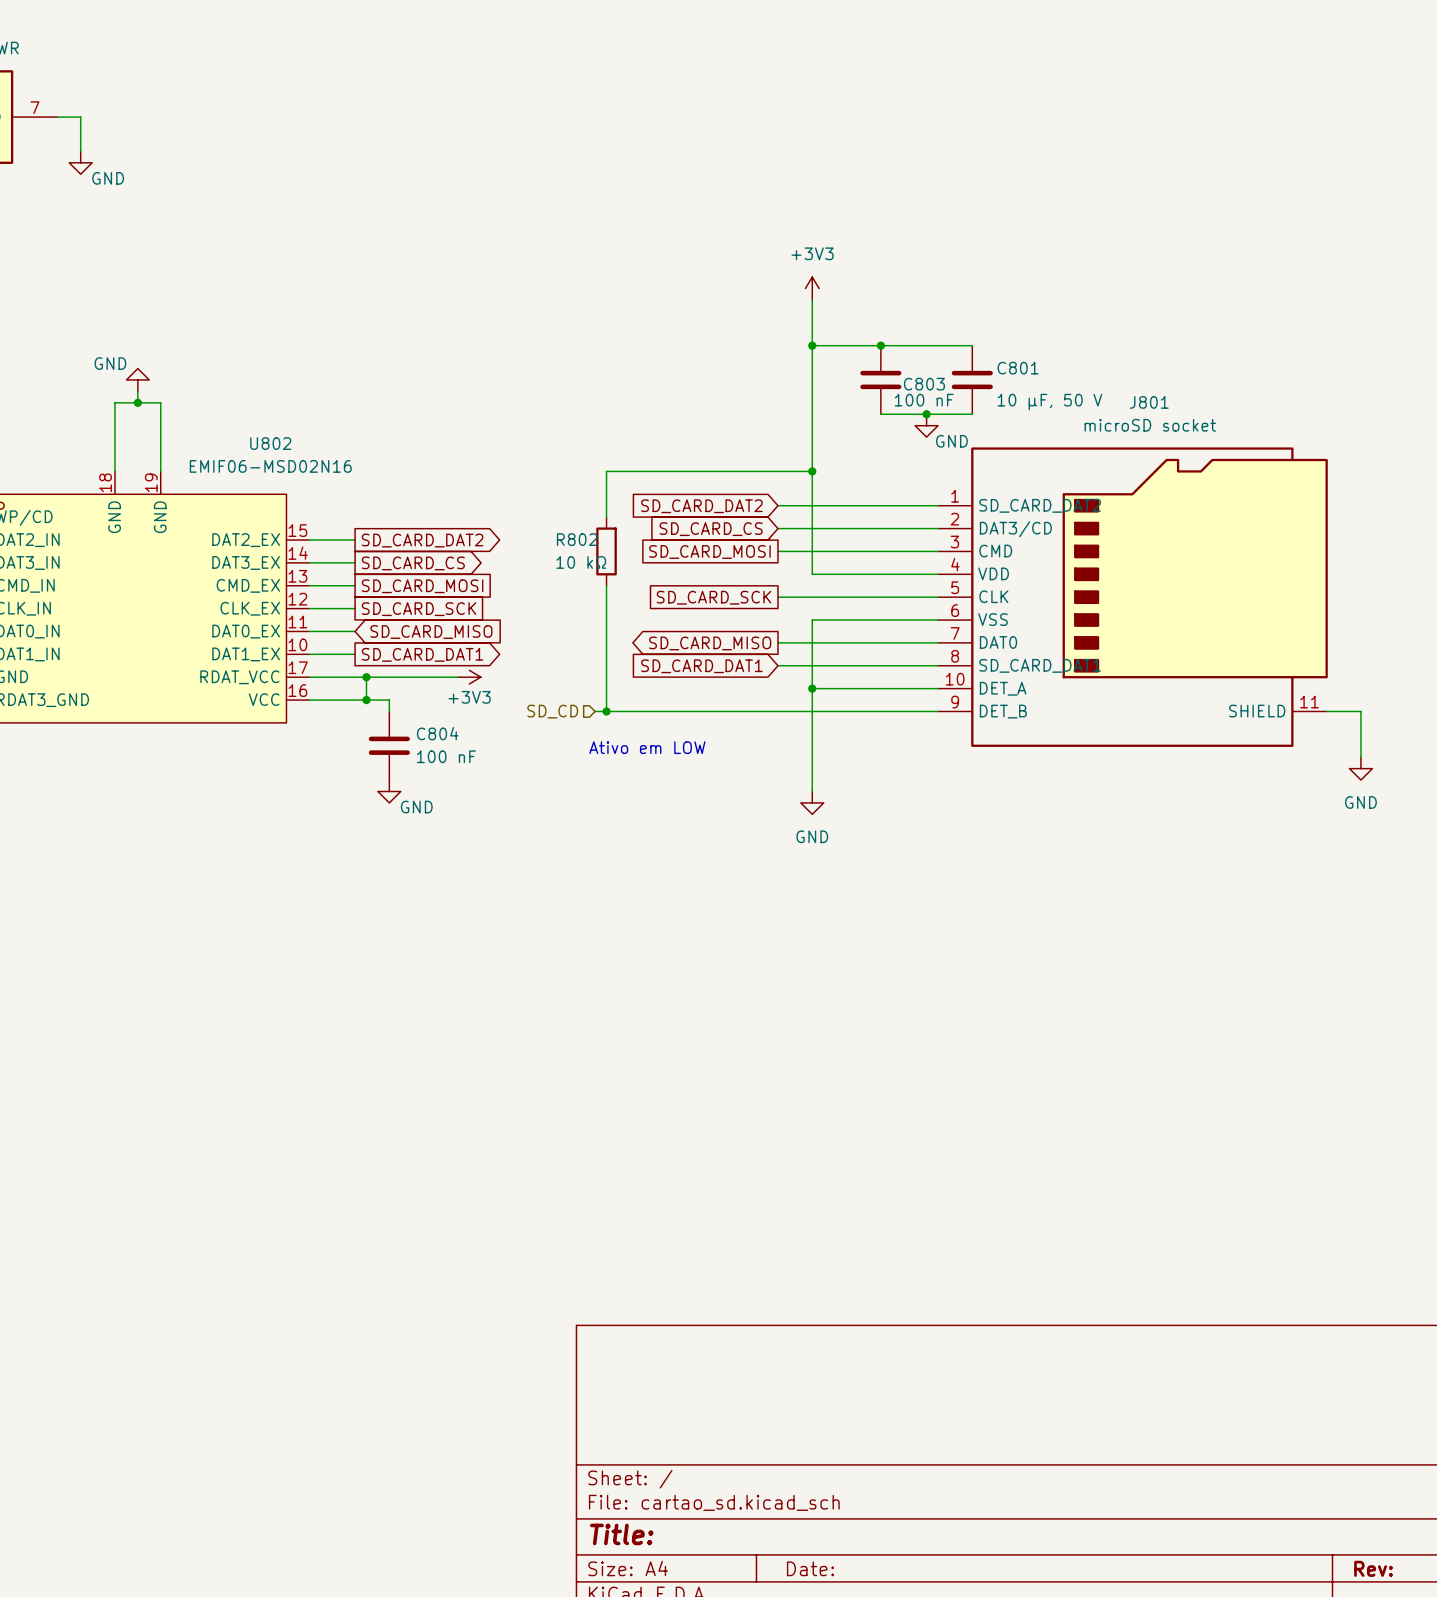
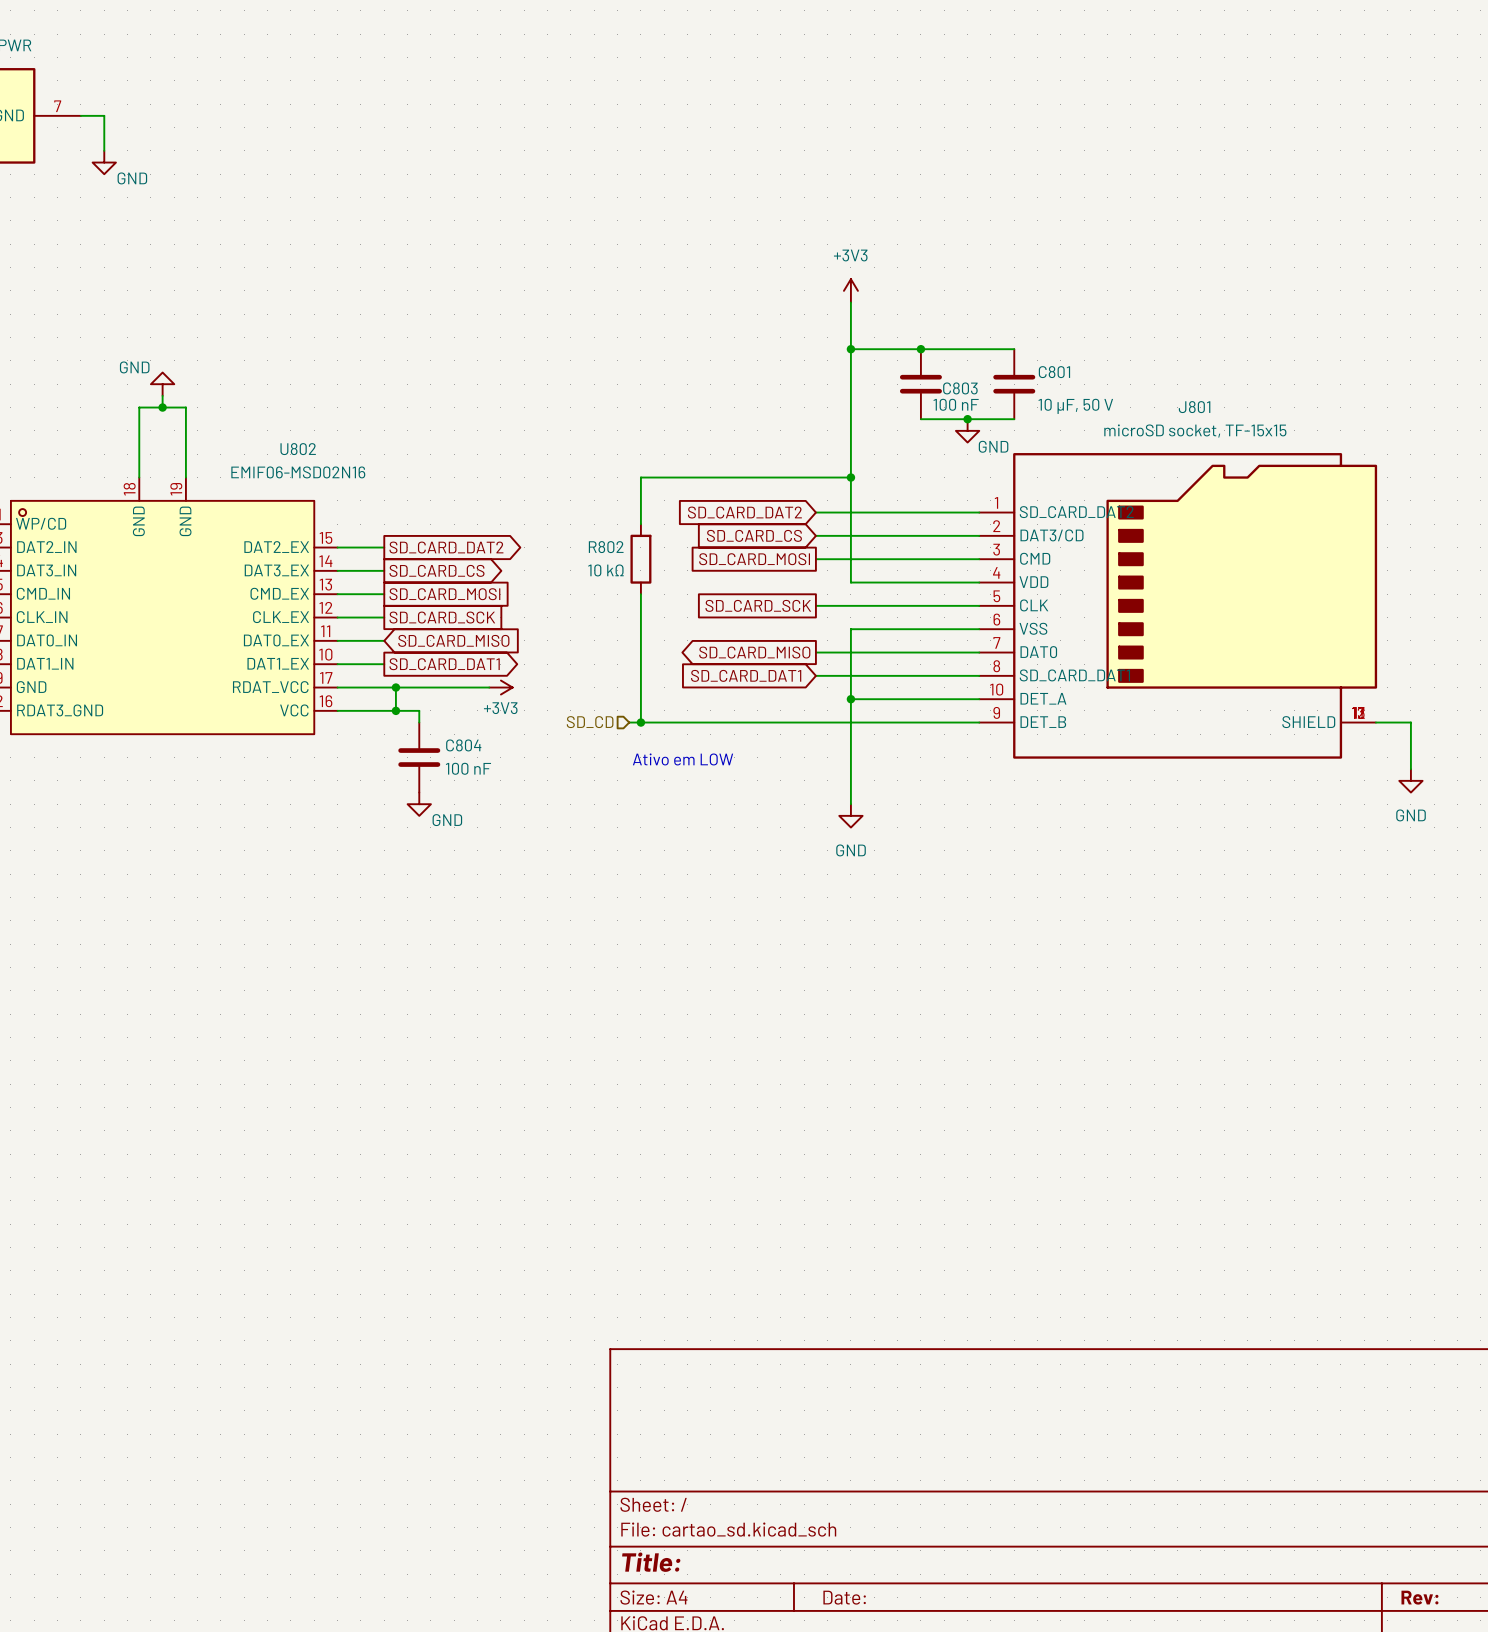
J801 value: microSD socket (1150, 425) -> microSD socket, TF-15x15 (1195, 431)
J801 symbol: [938, 447, 1328, 747] -> [979, 453, 1378, 759]

